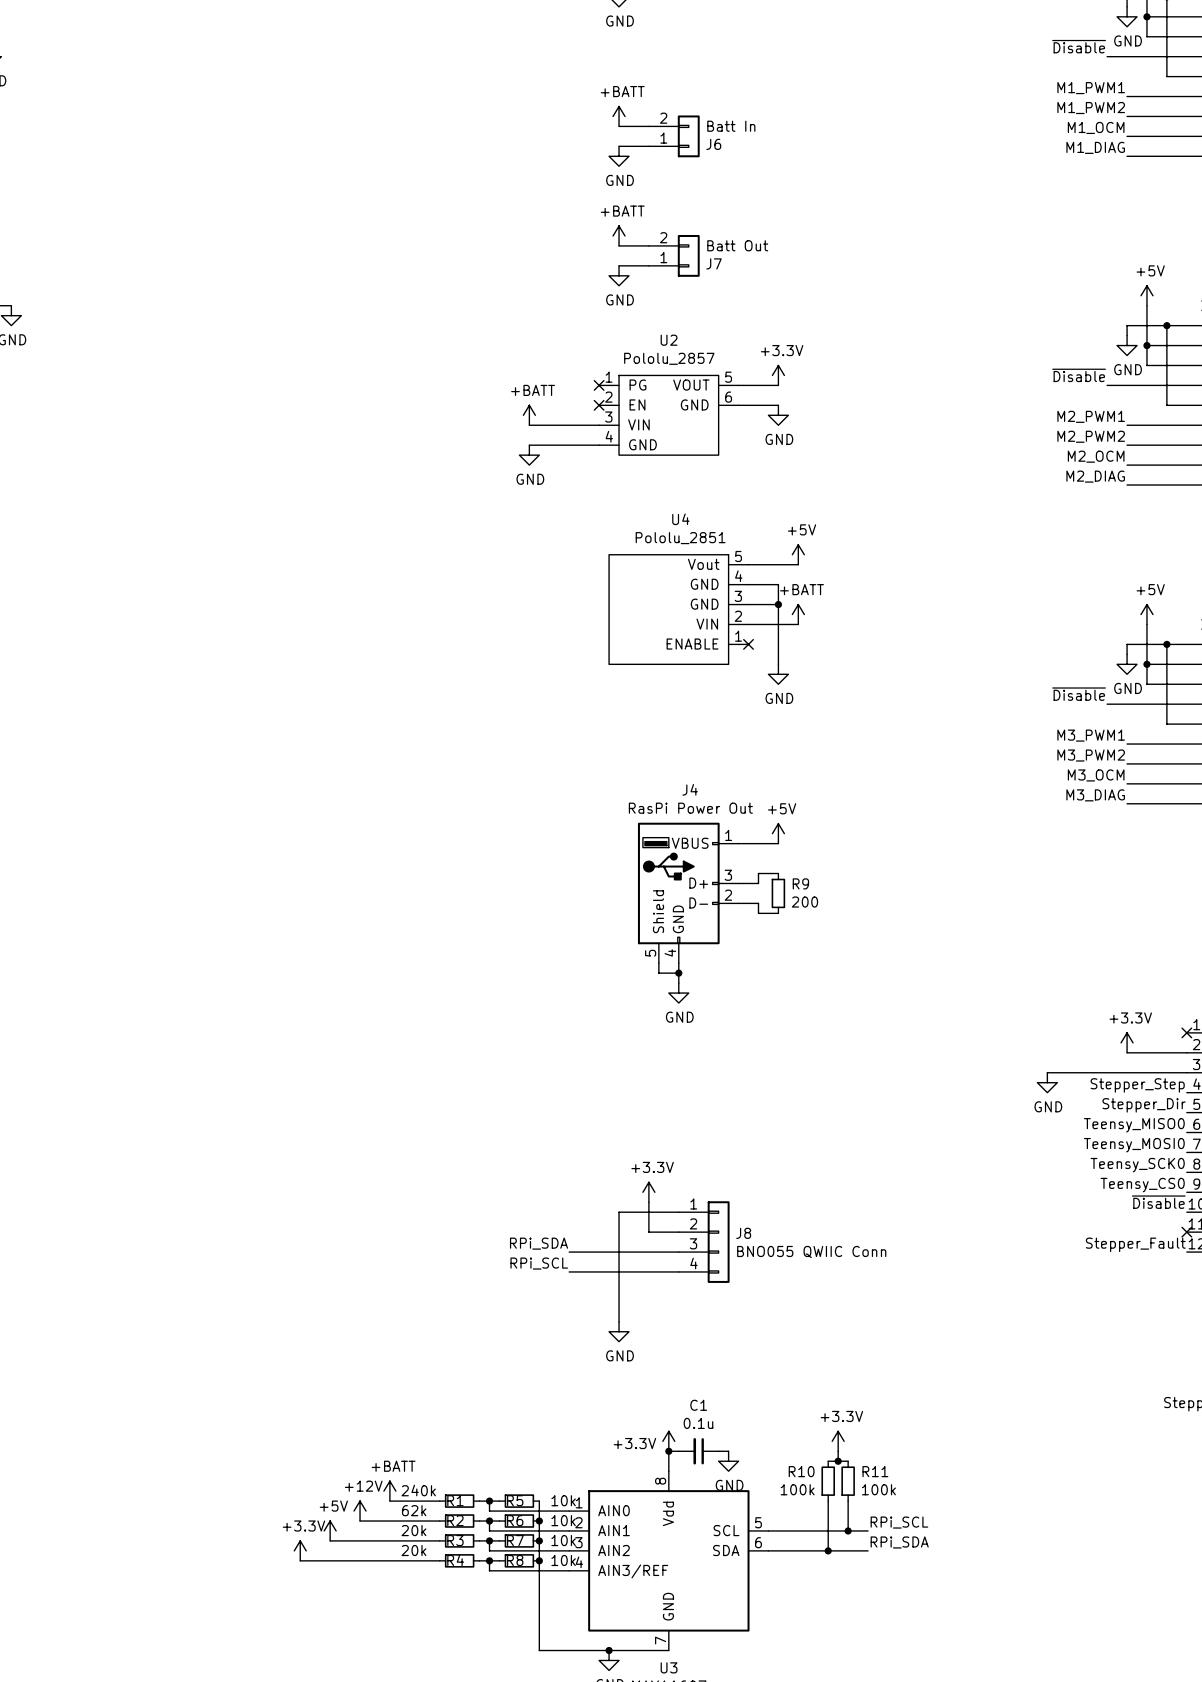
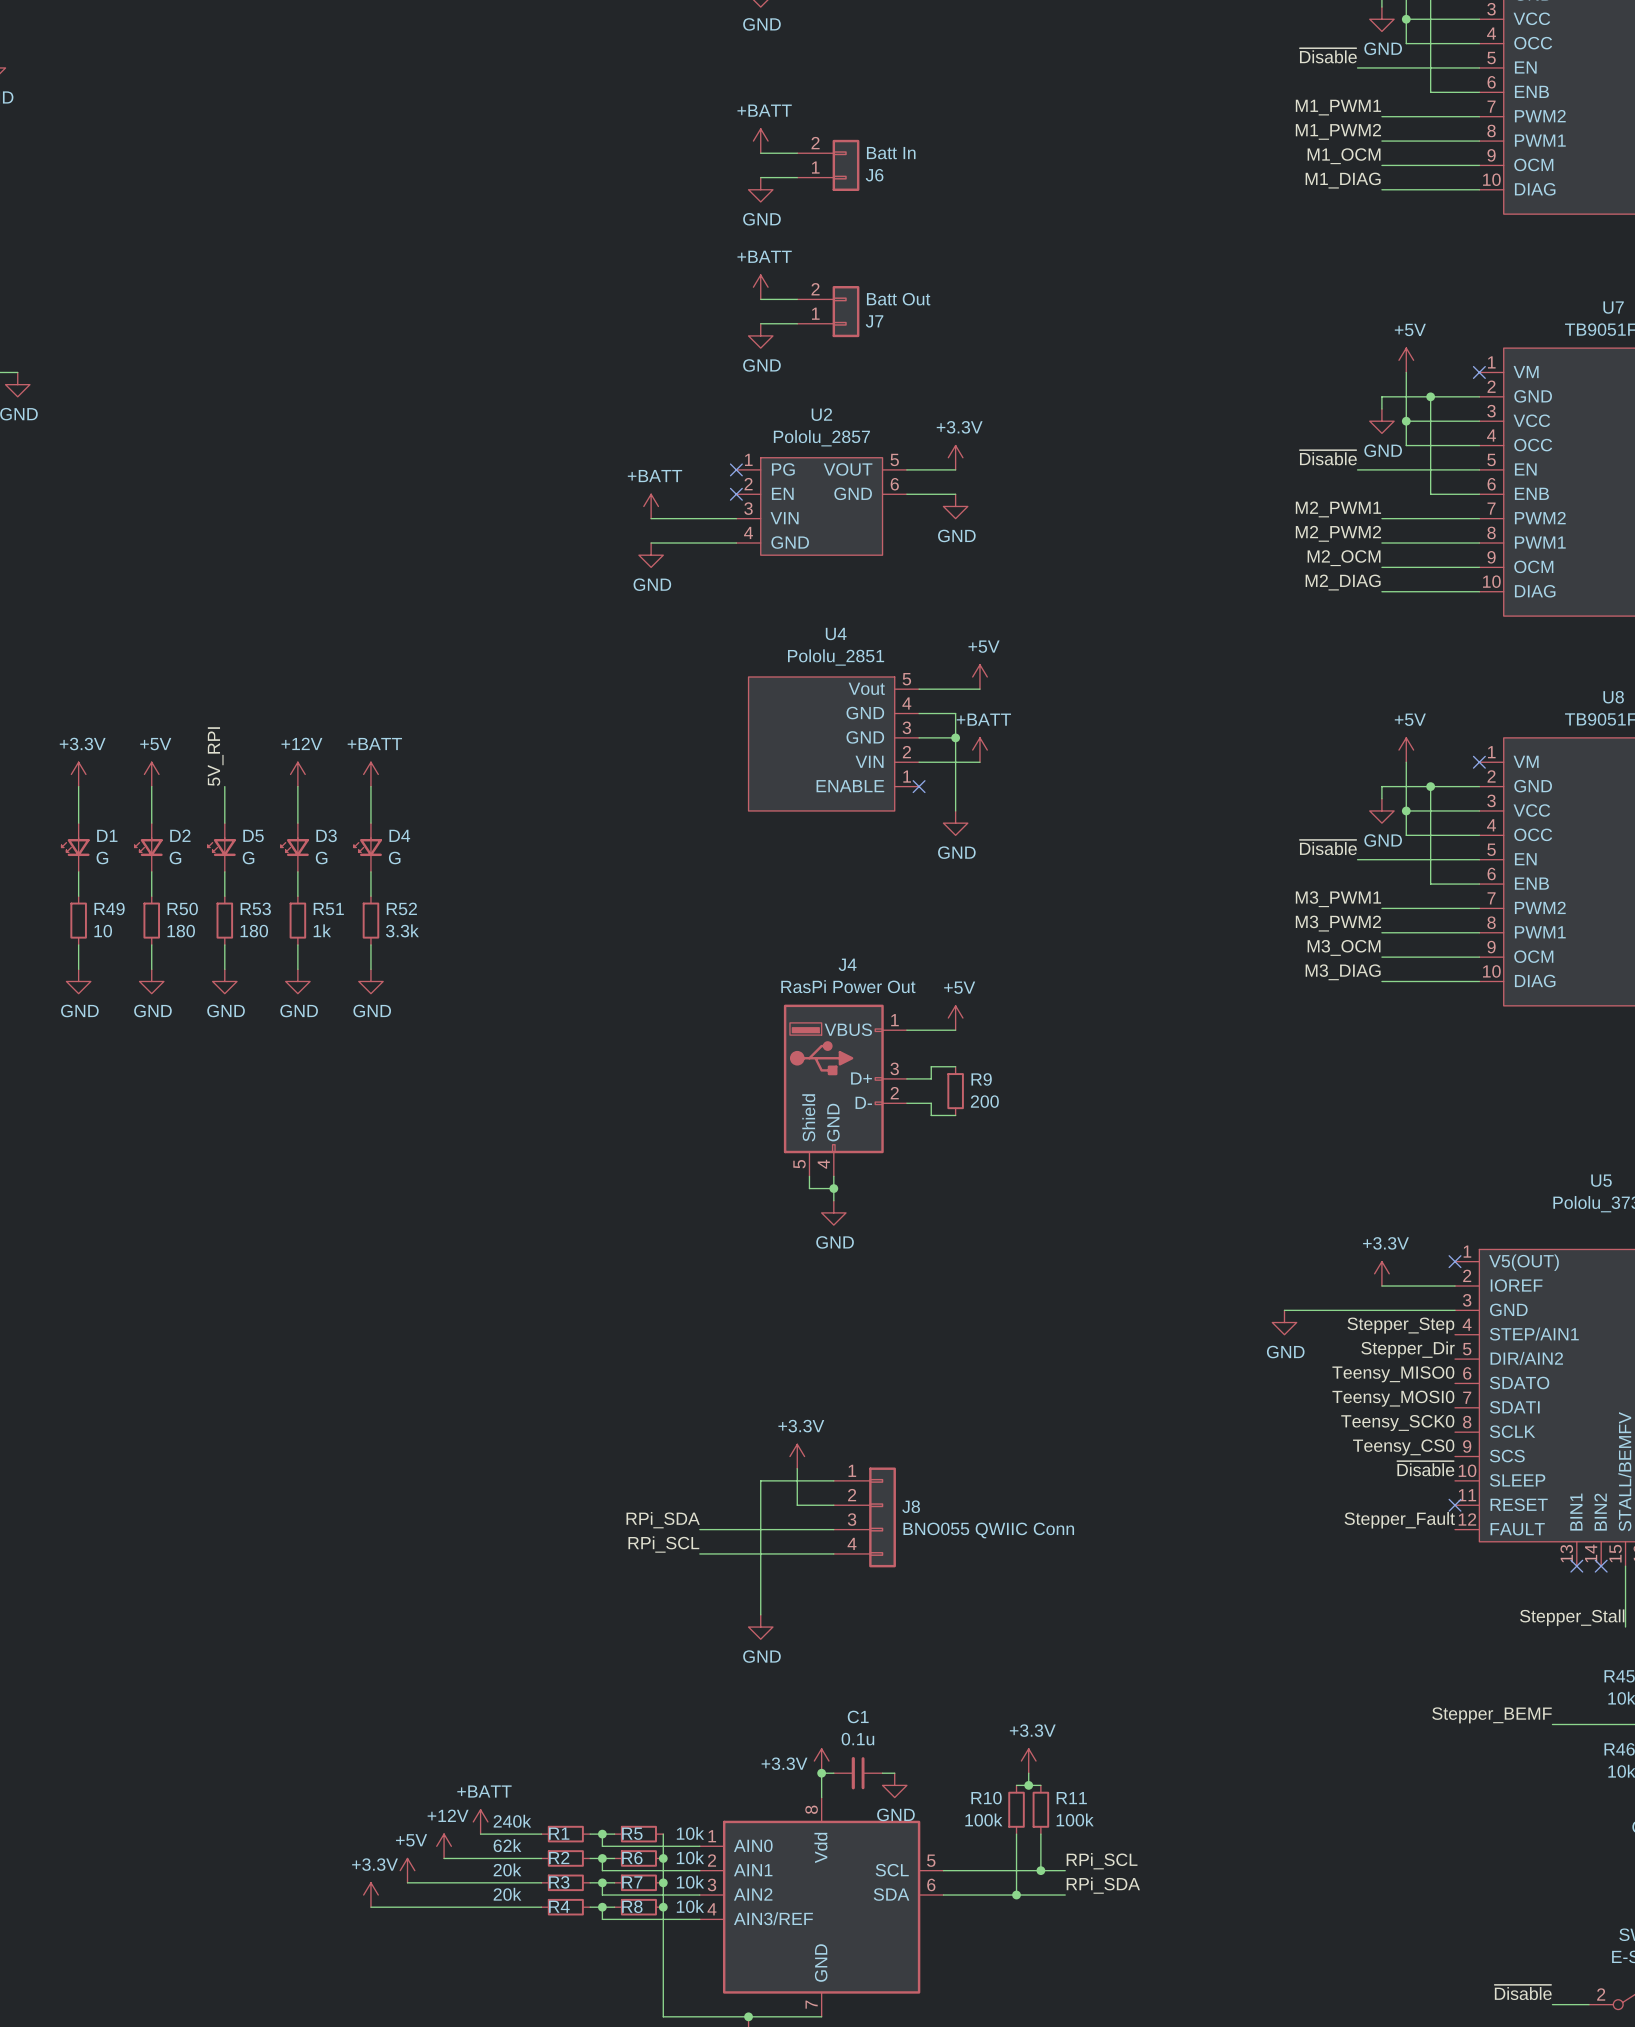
label: none -> 5V_RPI (215, 756)
power symbol: none -> +3.3V (78, 774)
power symbol: none -> +5V (151, 774)
power symbol: none -> +12V (297, 774)
power symbol: none -> +BATT (370, 774)
wire: none -> (78, 786) (78, 823)
wire: none -> (151, 786) (151, 823)
wire: none -> (224, 786) (224, 823)
wire: none -> (297, 786) (297, 823)
wire: none -> (370, 786) (370, 823)
D1: none -> G (75, 847)
D2: none -> G (148, 847)
D5: none -> G (221, 847)
D3: none -> G (294, 847)
D4: none -> G (367, 847)
wire: none -> (78, 871) (78, 896)
wire: none -> (151, 871) (151, 896)
wire: none -> (224, 871) (224, 896)
wire: none -> (297, 871) (297, 896)
wire: none -> (370, 871) (370, 896)
R49: none -> 10 (78, 920)
R50: none -> 180 (151, 920)
R53: none -> 180 (224, 920)
R51: none -> 1k (297, 920)
R52: none -> 3.3k (370, 920)
wire: none -> (78, 944) (78, 969)
wire: none -> (151, 944) (151, 969)
wire: none -> (224, 944) (224, 969)
wire: none -> (297, 944) (297, 969)
wire: none -> (370, 944) (370, 969)
power symbol: none -> GND (78, 981)
power symbol: none -> GND (151, 981)
power symbol: none -> GND (224, 981)
power symbol: none -> GND (297, 981)
power symbol: none -> GND (370, 981)

